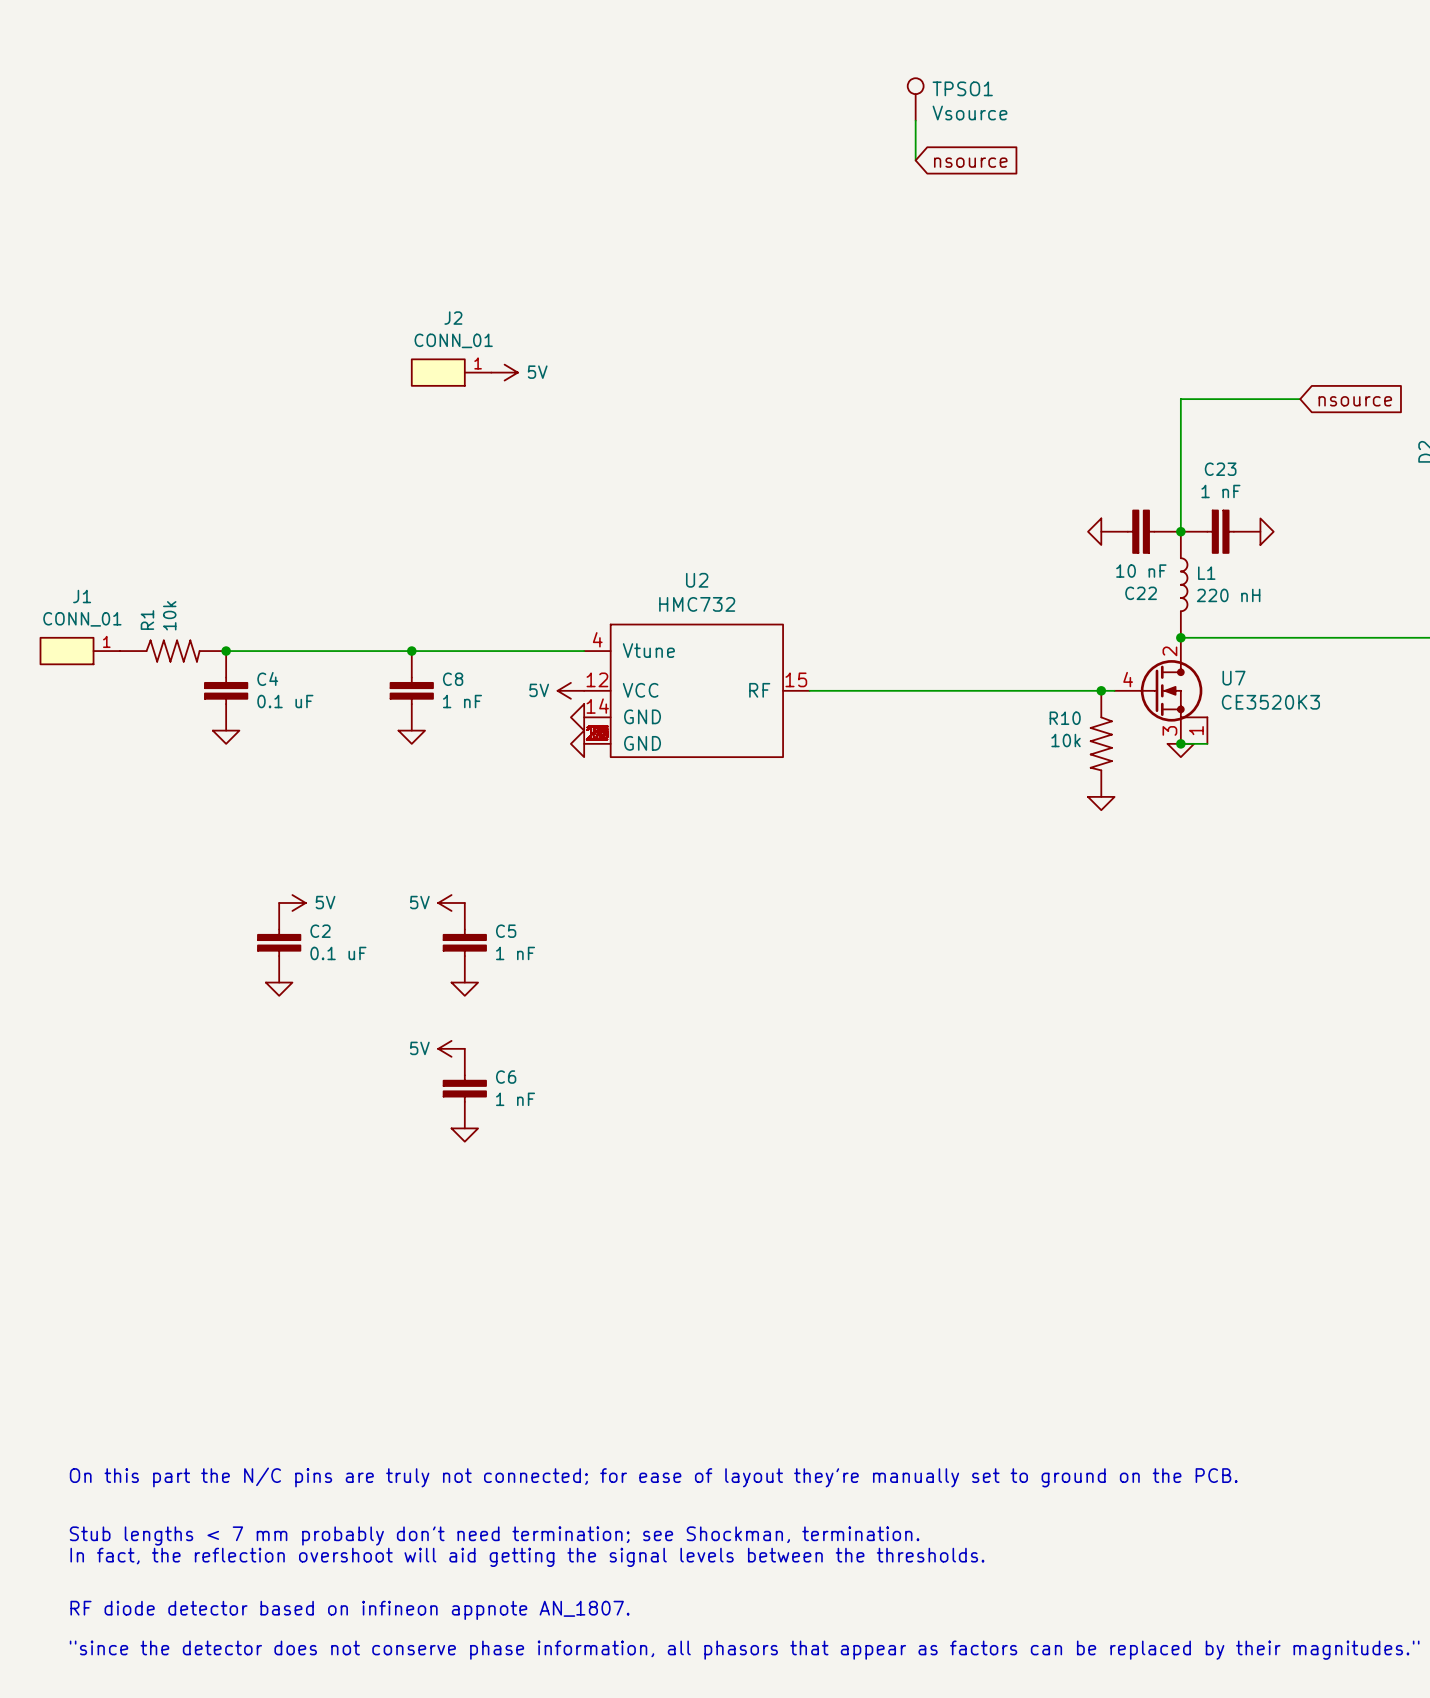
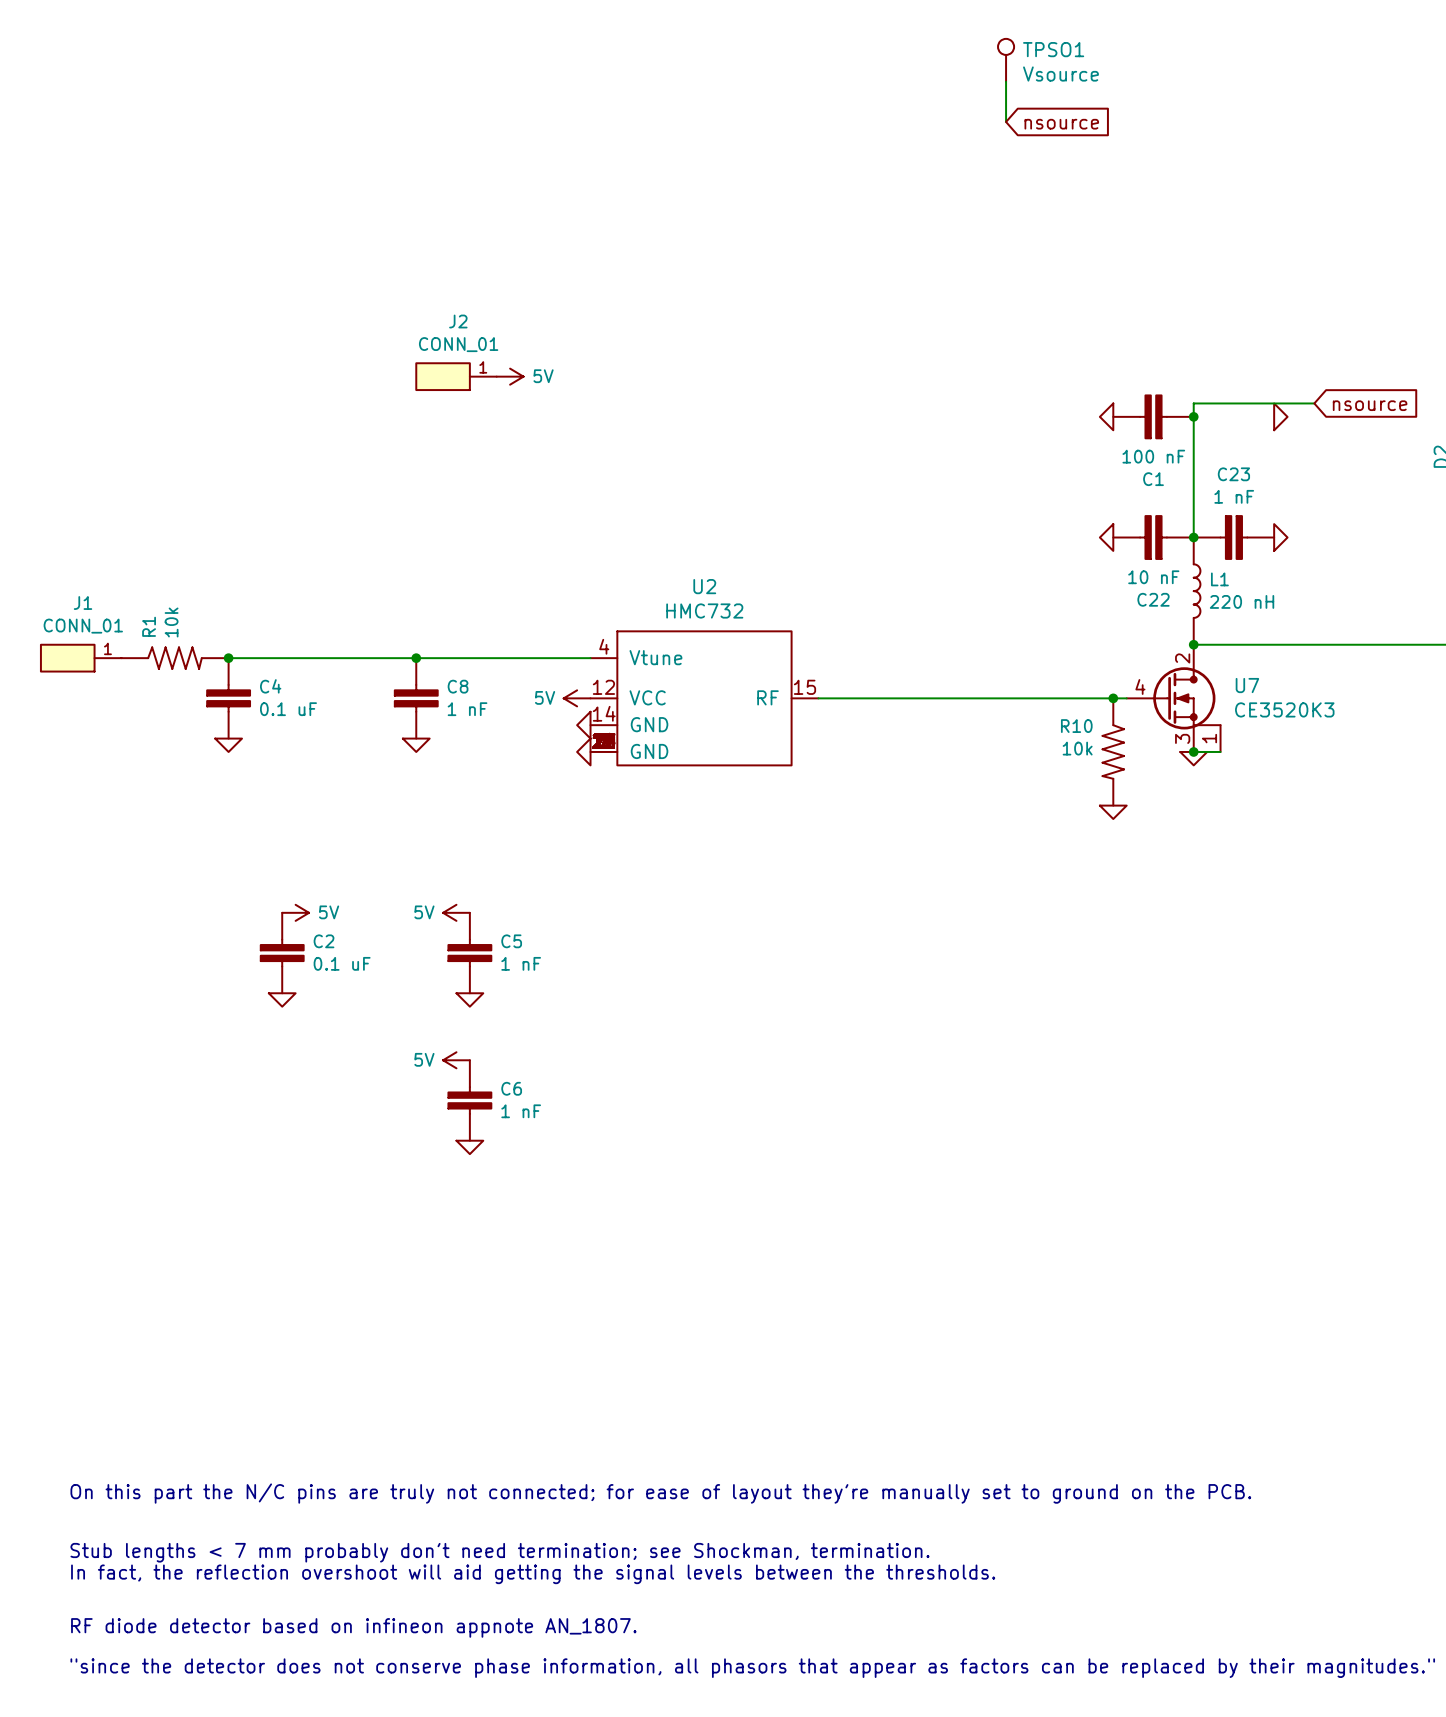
TPSO1 position: (915, 99) -> (1006, 60)
wire: (915, 120) (915, 160) -> (1006, 81) (1006, 121)
global label position: nsource (970, 162) -> nsource (1061, 124)
power symbol: none -> (1106, 416)
C1: none -> 100 nF (1153, 416)
junction: none -> (1193, 416)
power symbol: none -> (1280, 416)

